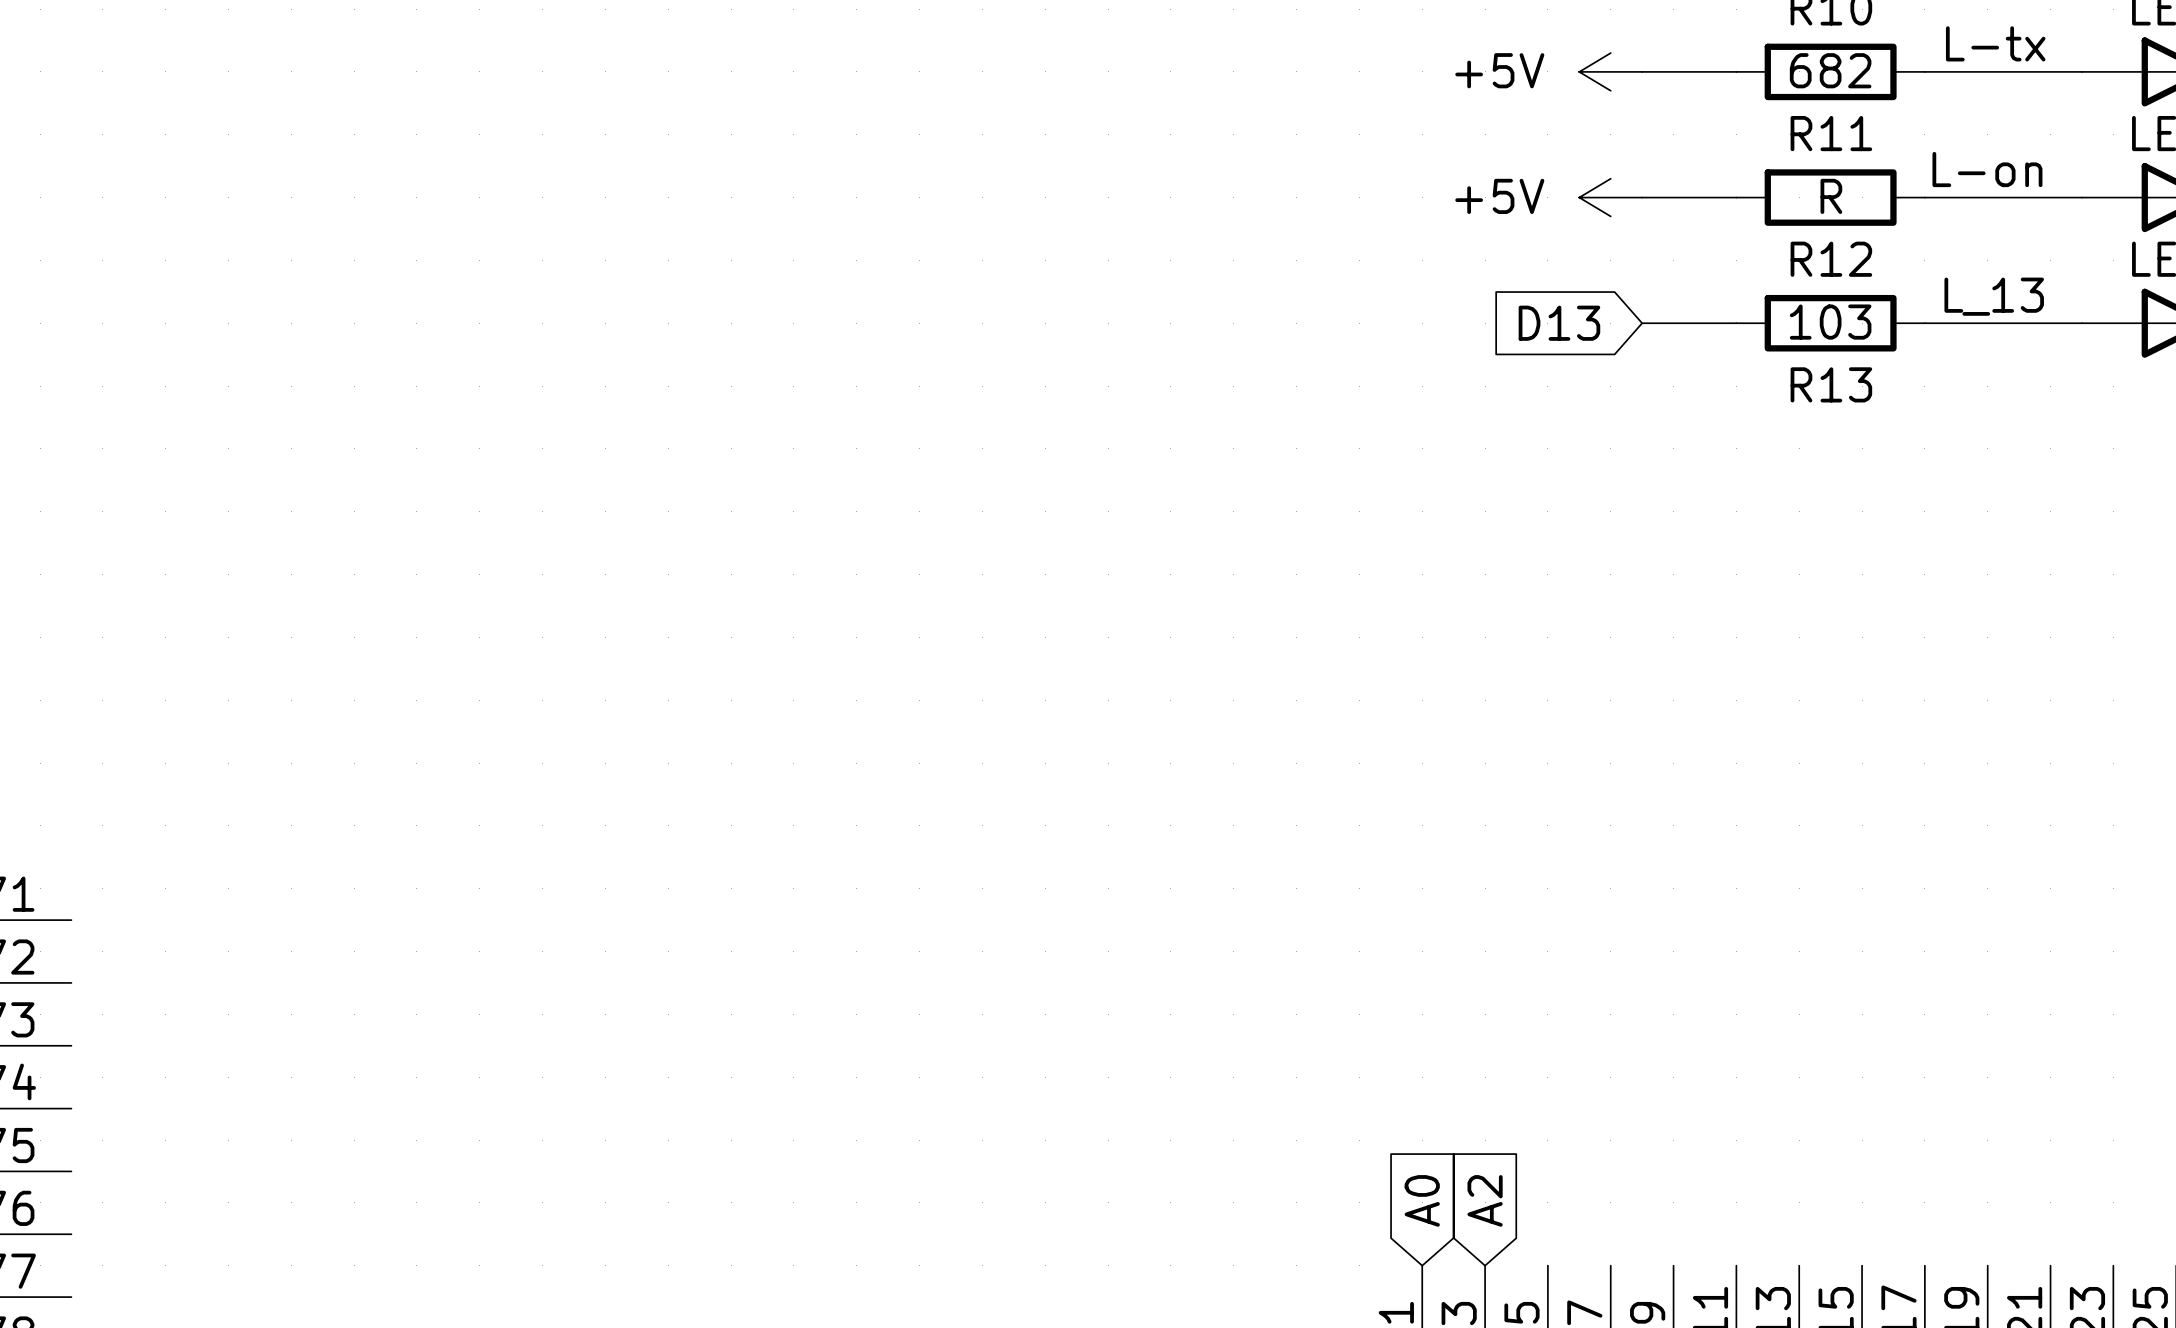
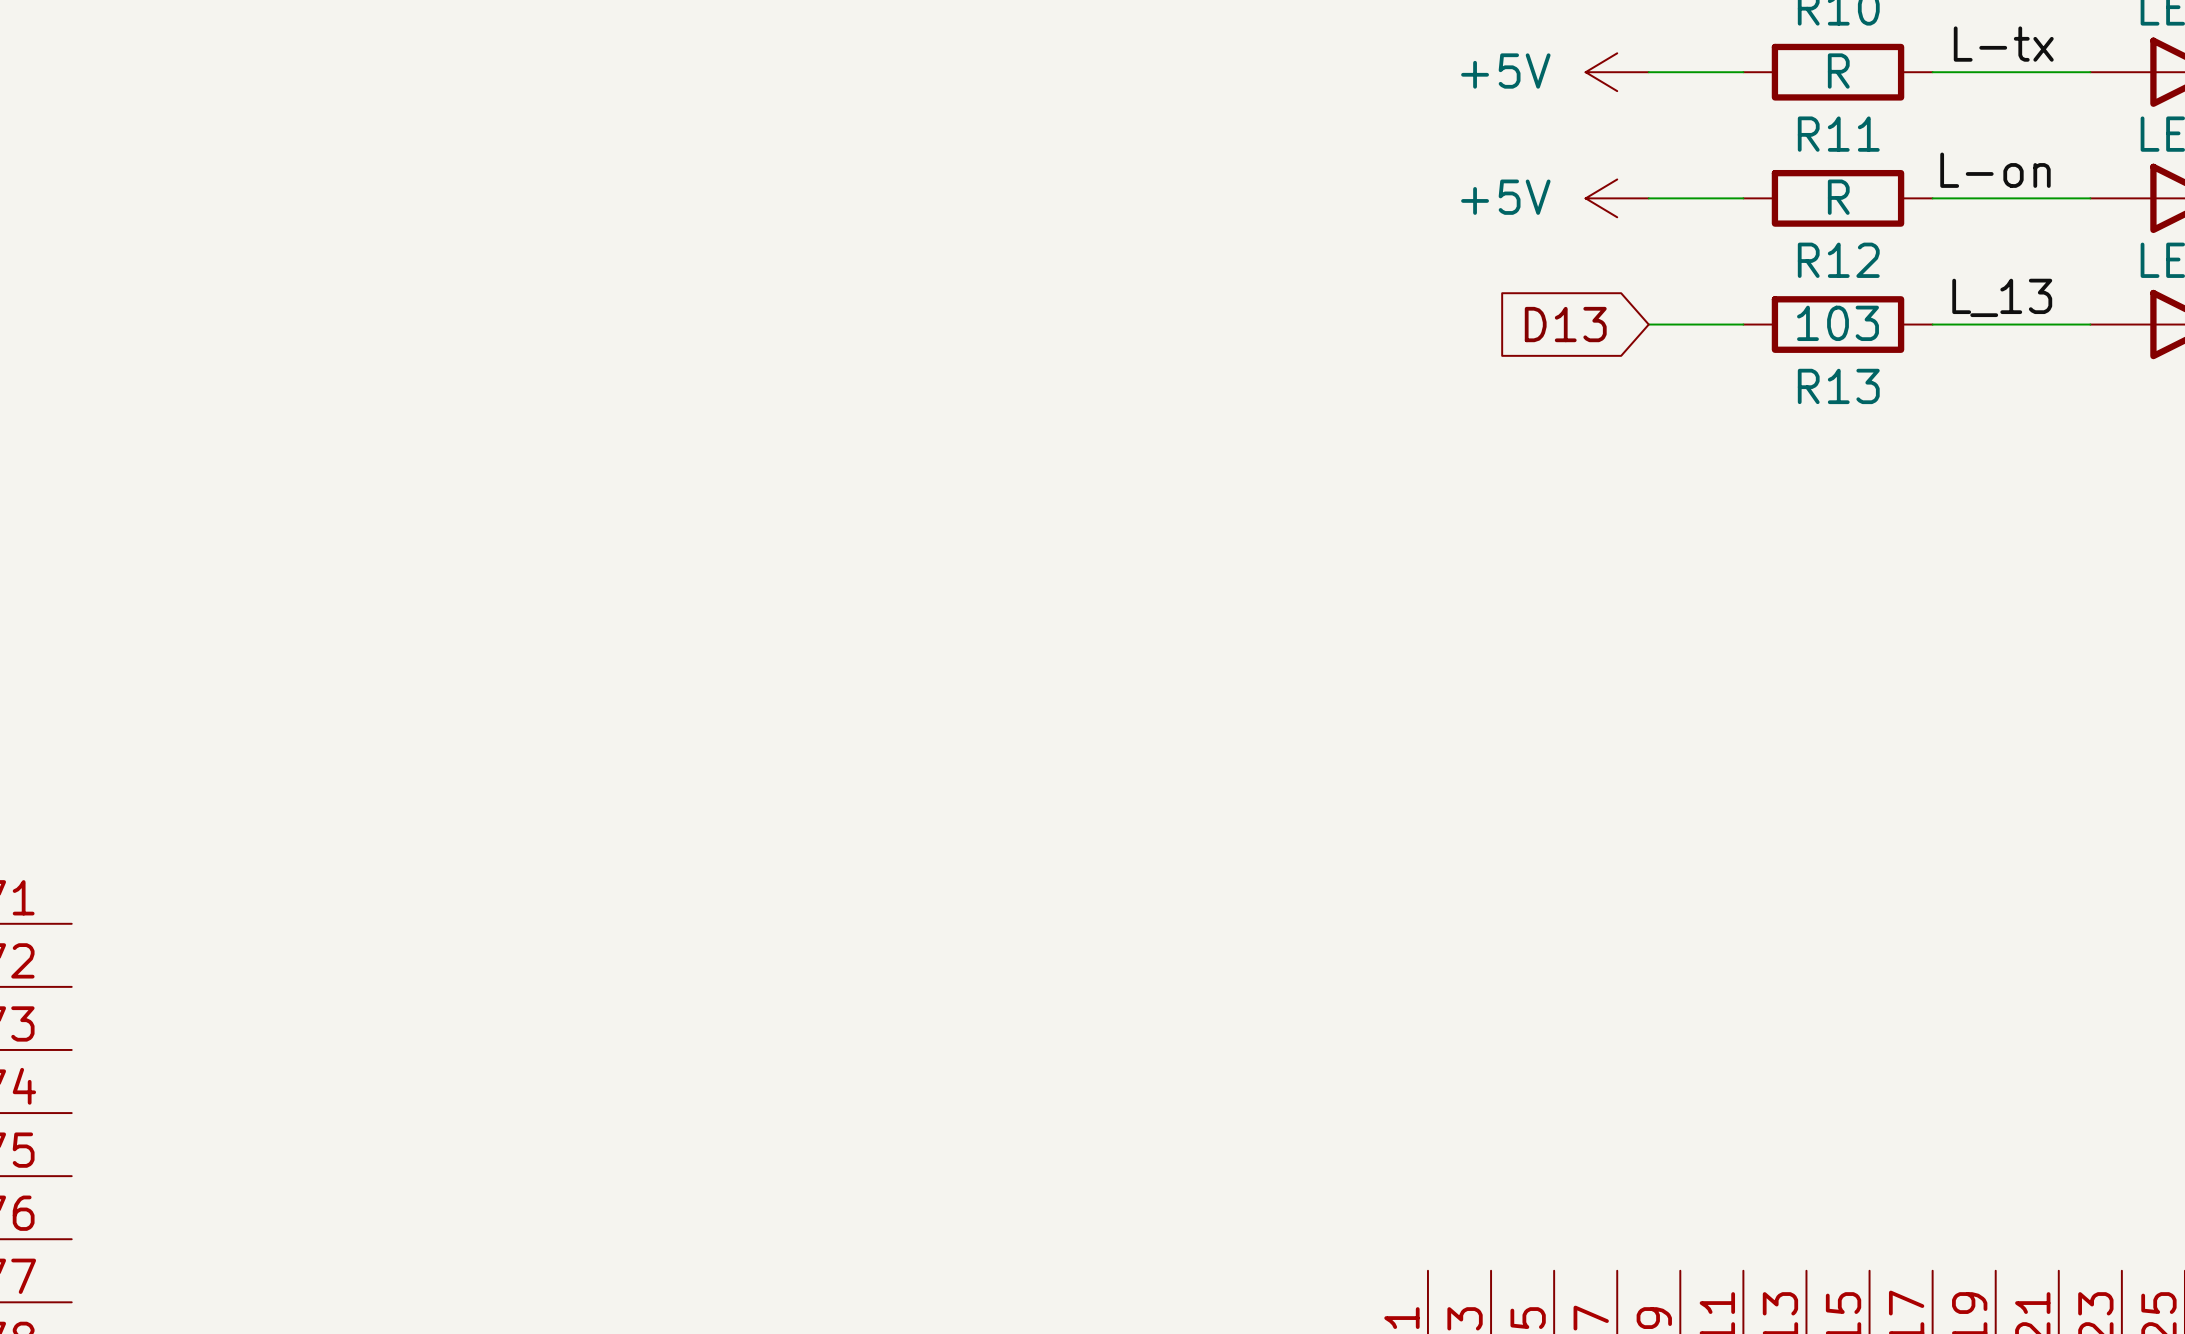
R11 value: 682 (1830, 70) -> R (1838, 71)
global label: A0 (1422, 1200) -> none
global label: A2 (1485, 1200) -> none

